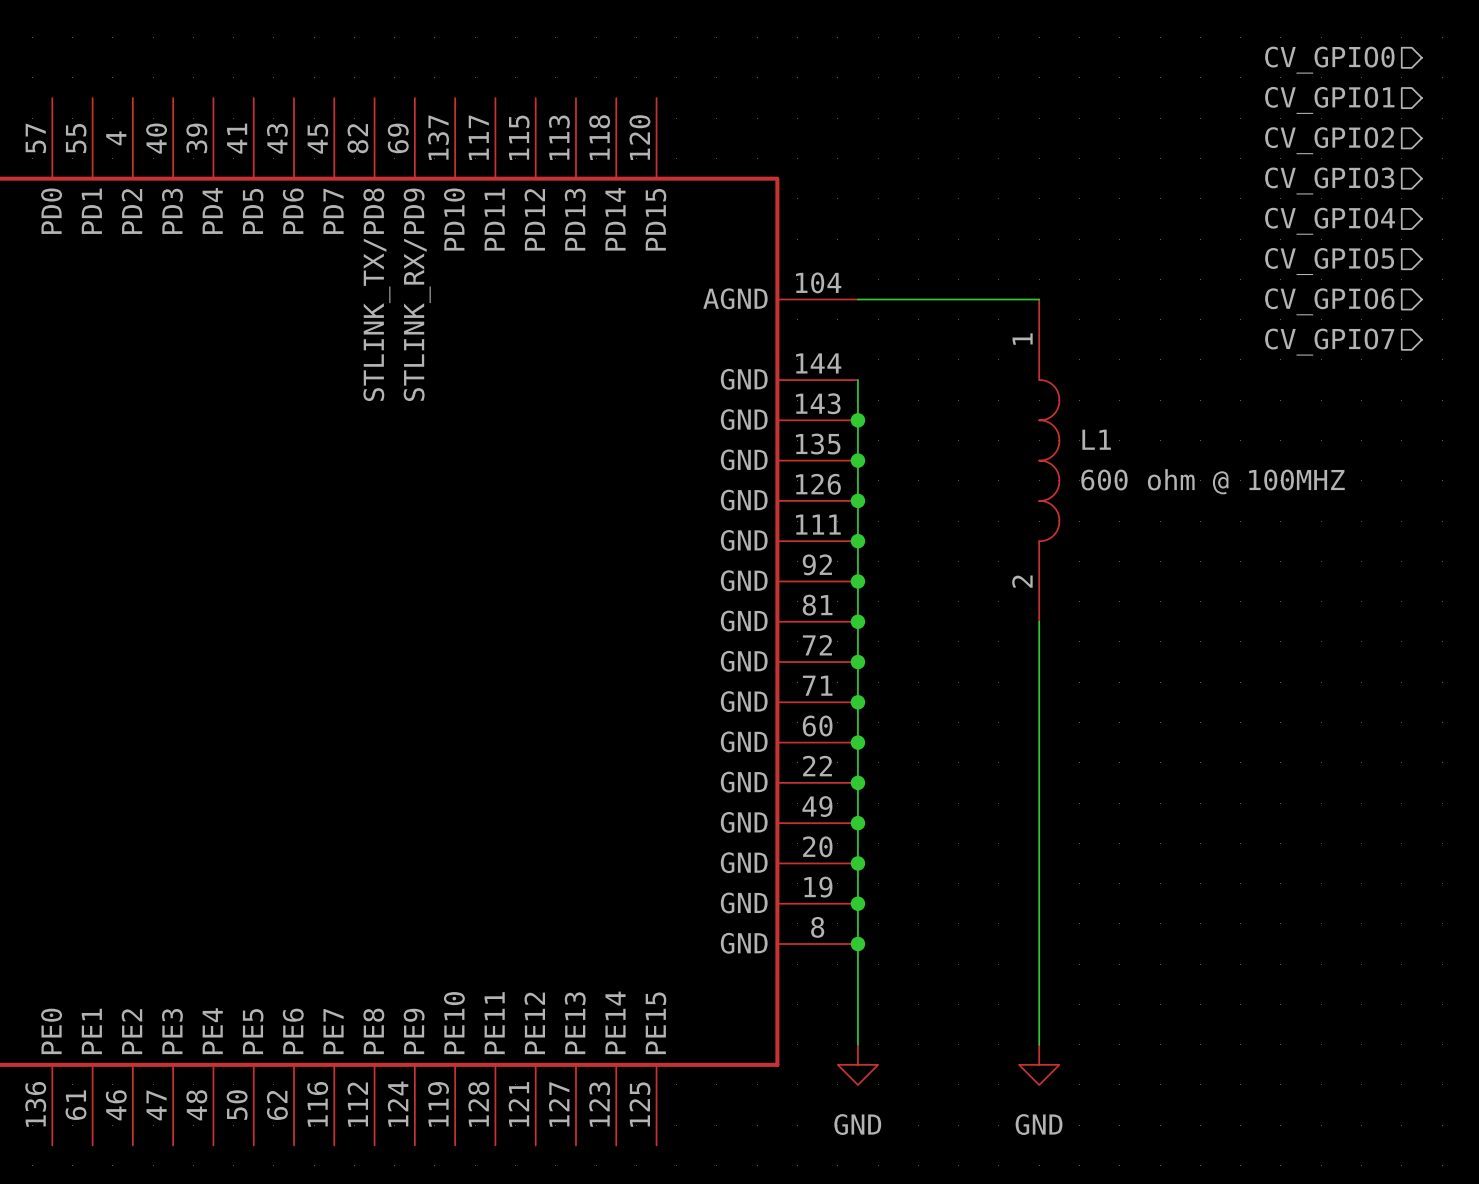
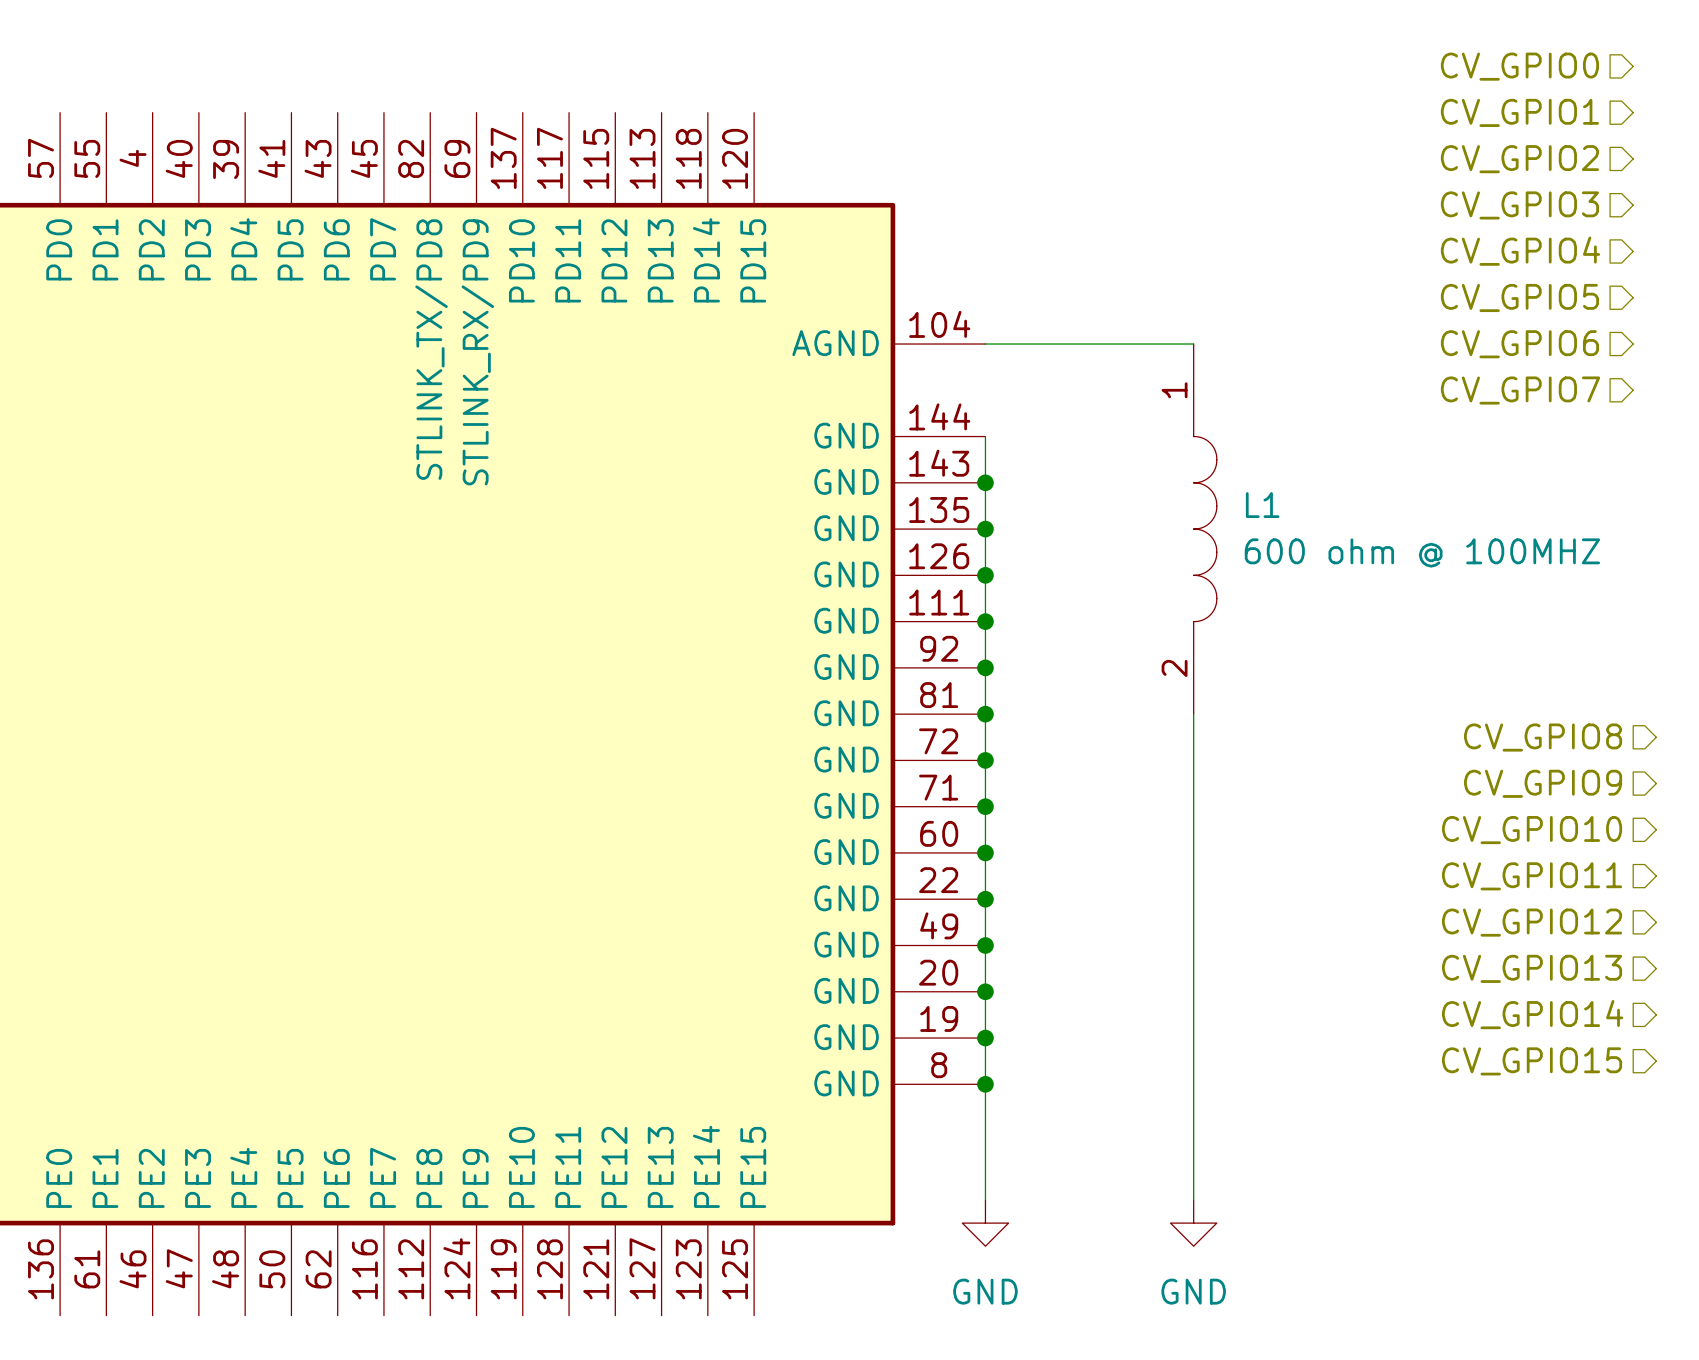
hierarchical label: none -> CV_GPIO8 (1543, 737)
hierarchical label: none -> CV_GPIO9 (1543, 783)
hierarchical label: none -> CV_GPIO10 (1532, 830)
hierarchical label: none -> CV_GPIO11 (1532, 876)
hierarchical label: none -> CV_GPIO12 (1532, 922)
hierarchical label: none -> CV_GPIO13 (1532, 968)
hierarchical label: none -> CV_GPIO14 (1532, 1014)
hierarchical label: none -> CV_GPIO15 (1532, 1061)

